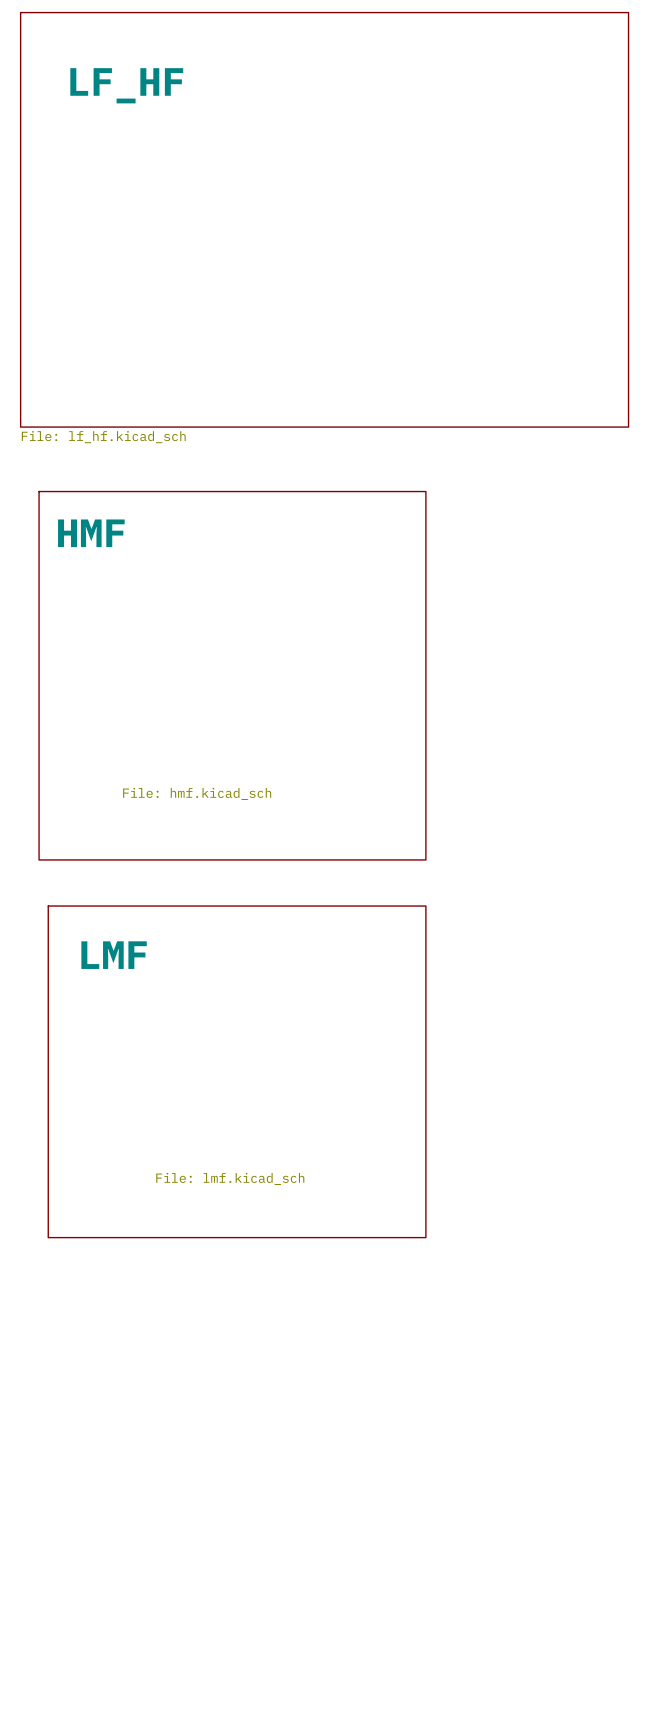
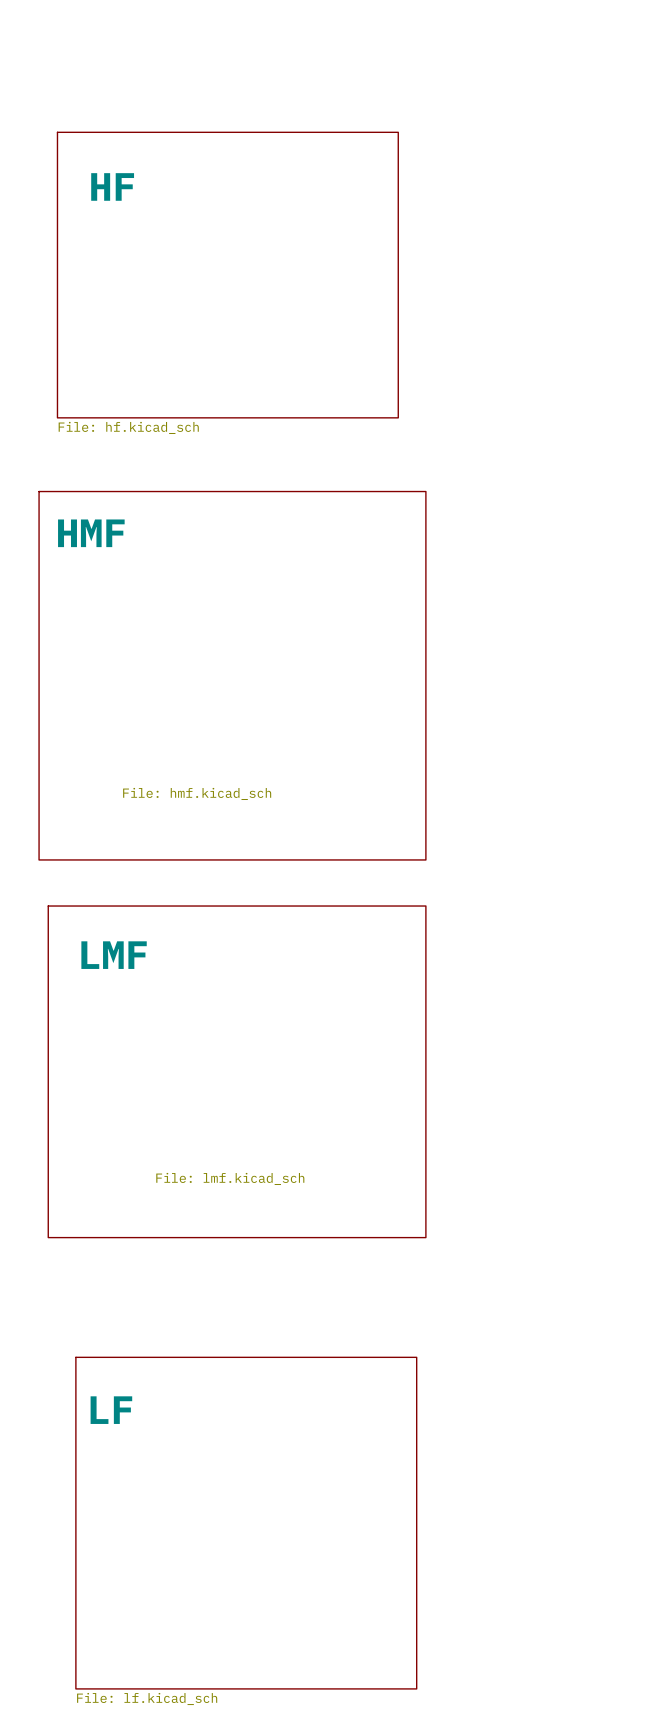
sheet LF_HF: File: lf_hf.kicad_sch (324, 219) -> none
sheet HF: none -> File: hf.kicad_sch (227, 275)
sheet LF: none -> File: lf.kicad_sch (246, 1523)

